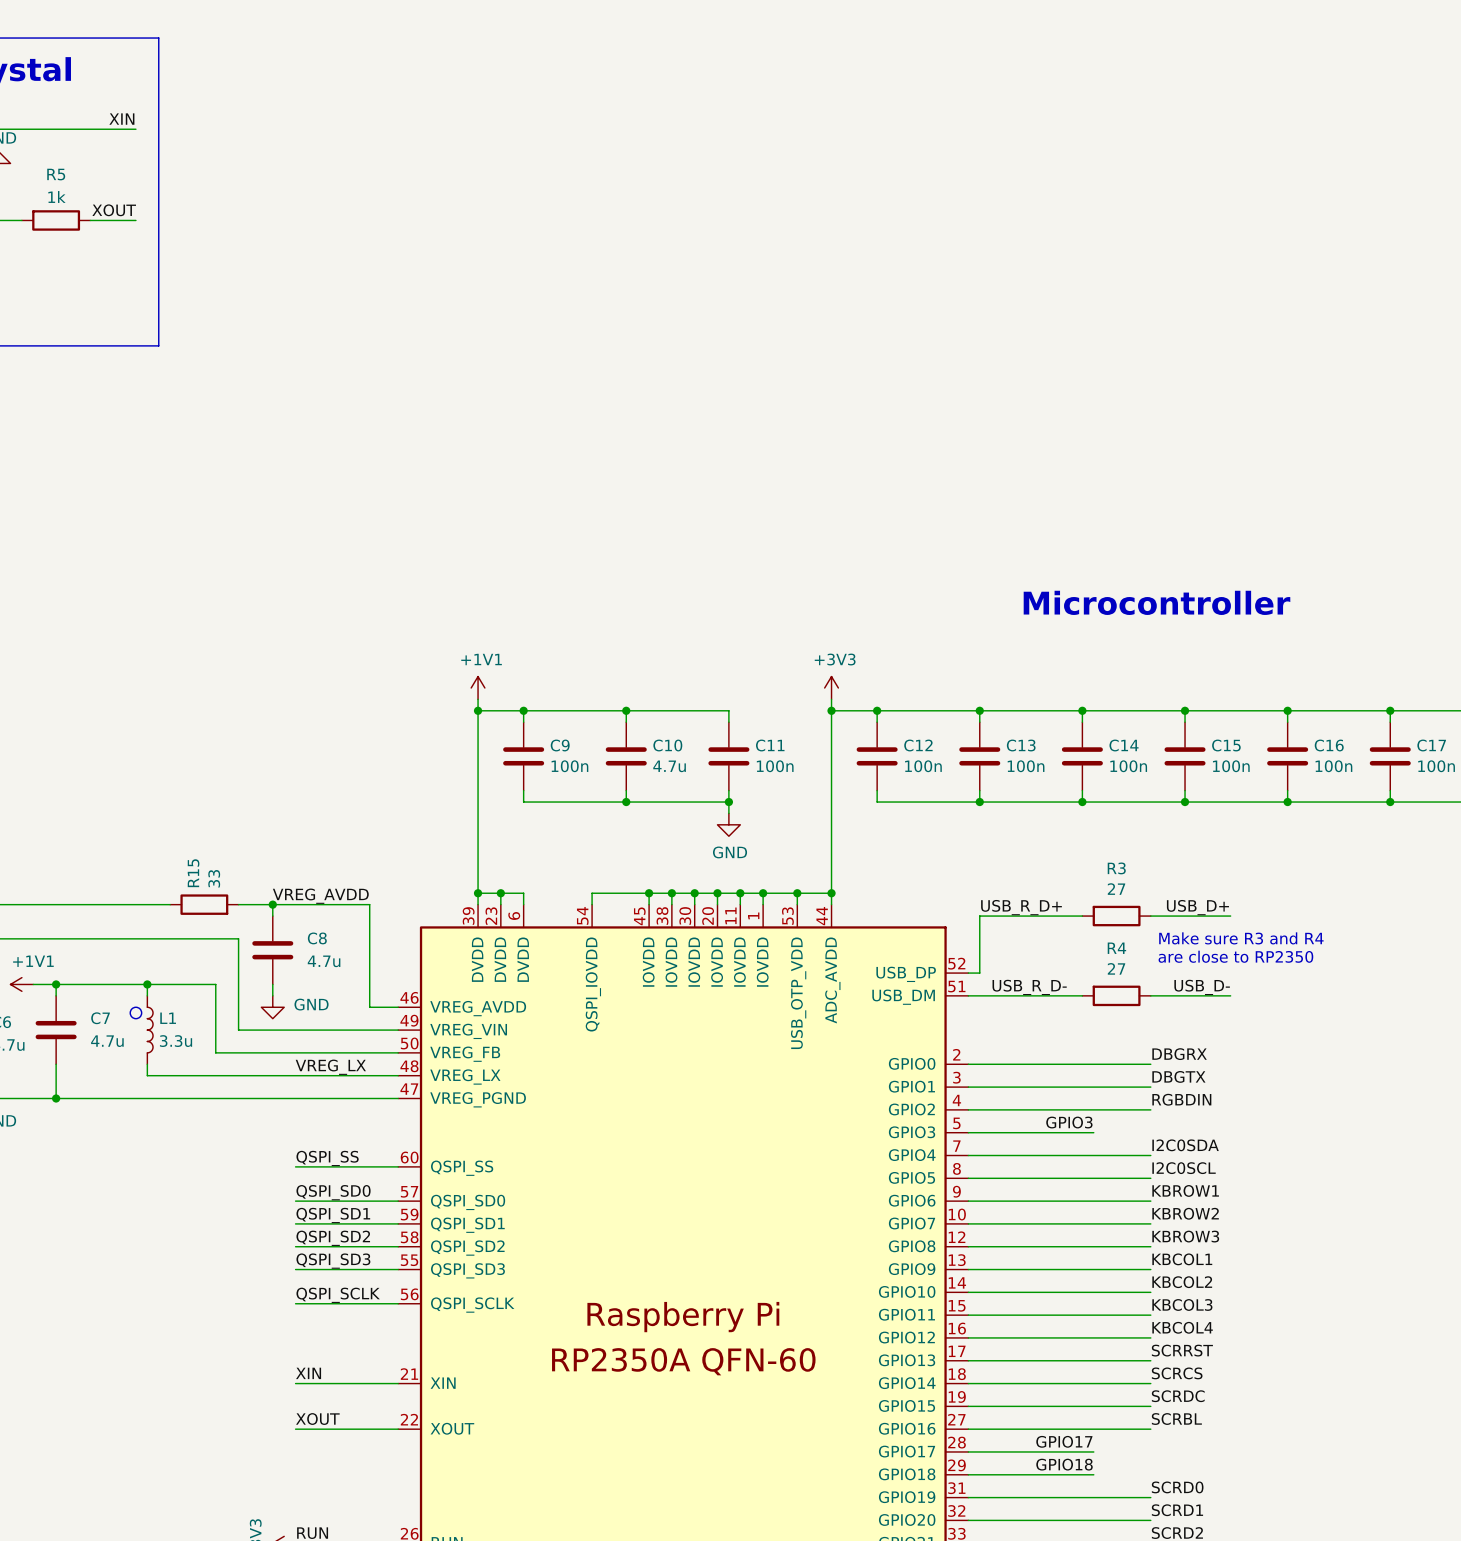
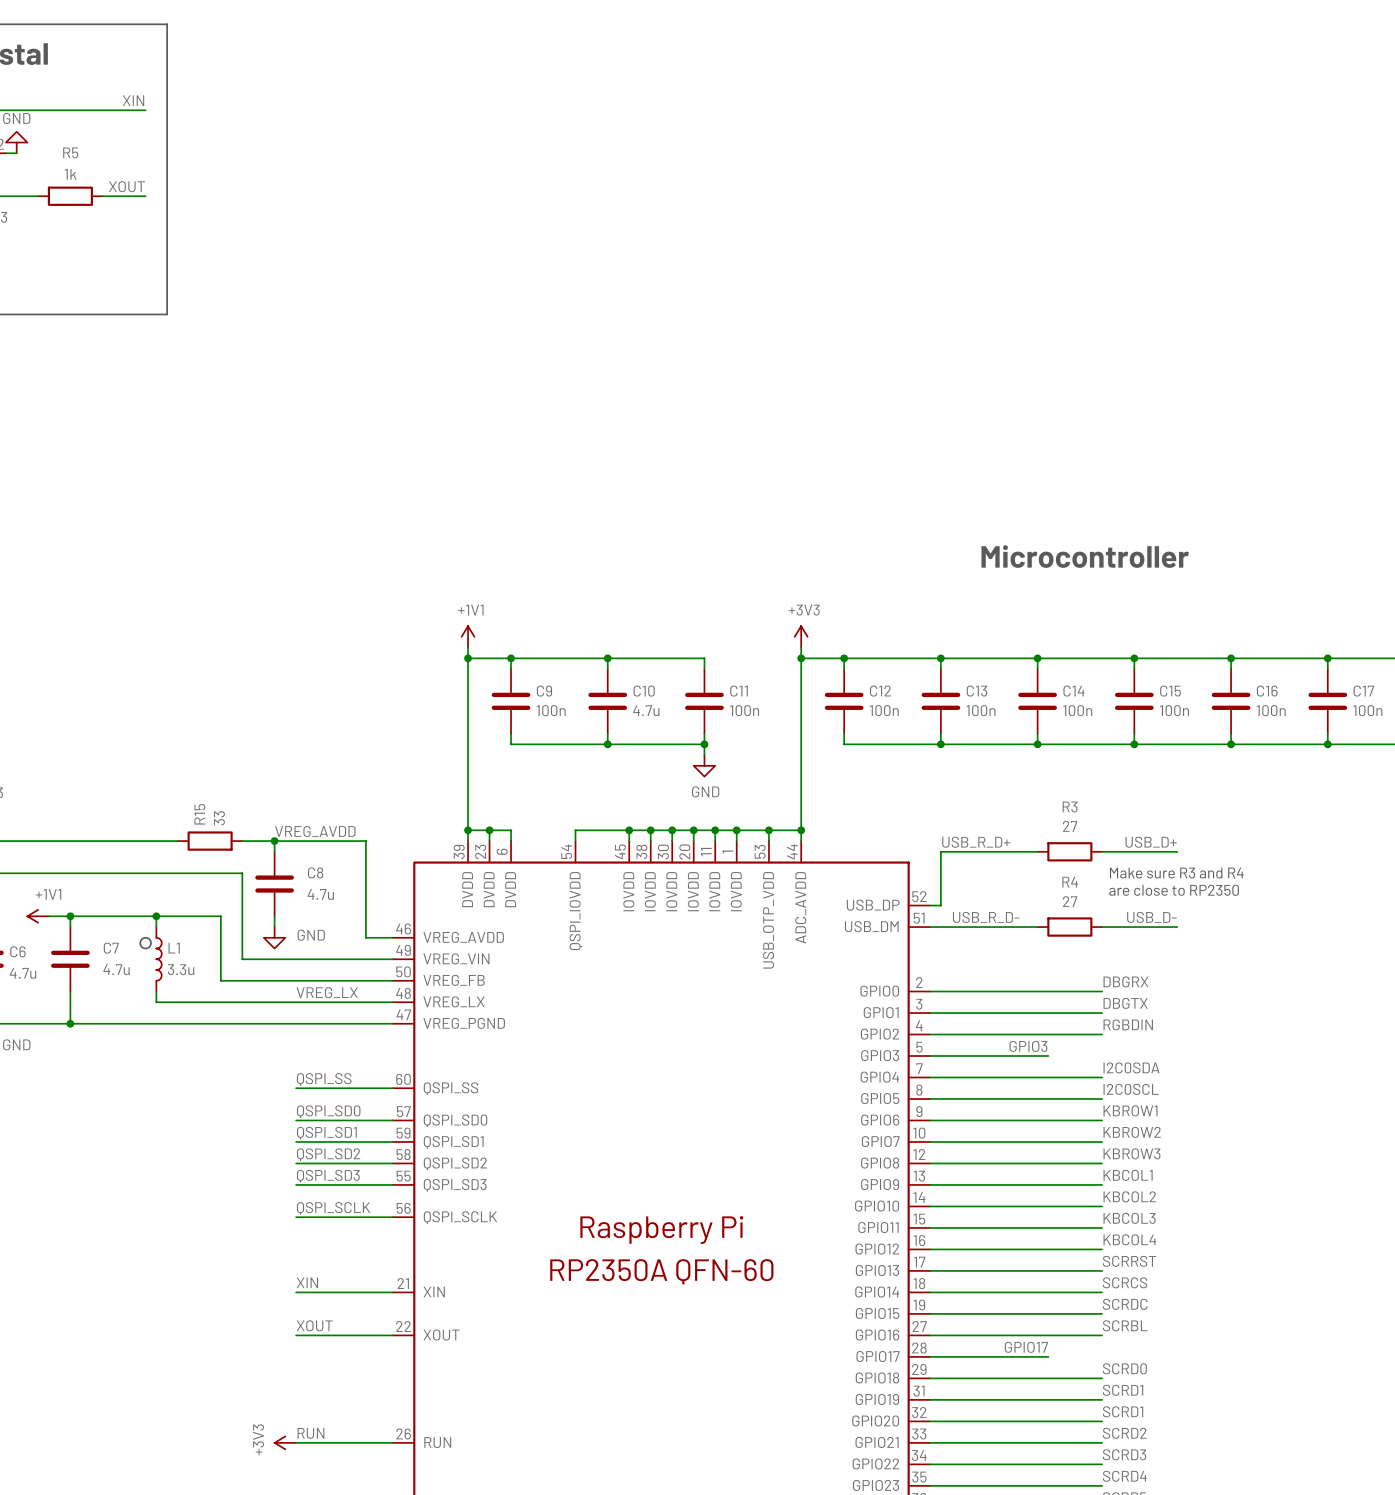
label: GPIO18 (1064, 1464) -> none
label: none -> SCRD0 (1124, 1368)
wire: none -> (1048, 1378) (1102, 1378)
label: SCRD0 (1177, 1487) -> SCRD1 (1123, 1390)

